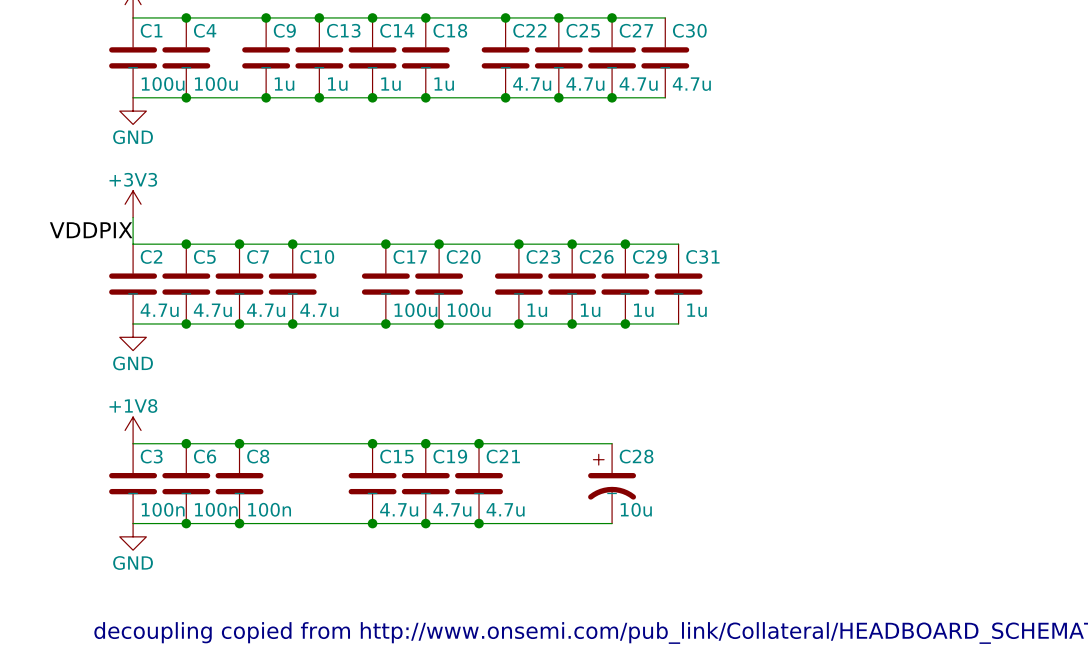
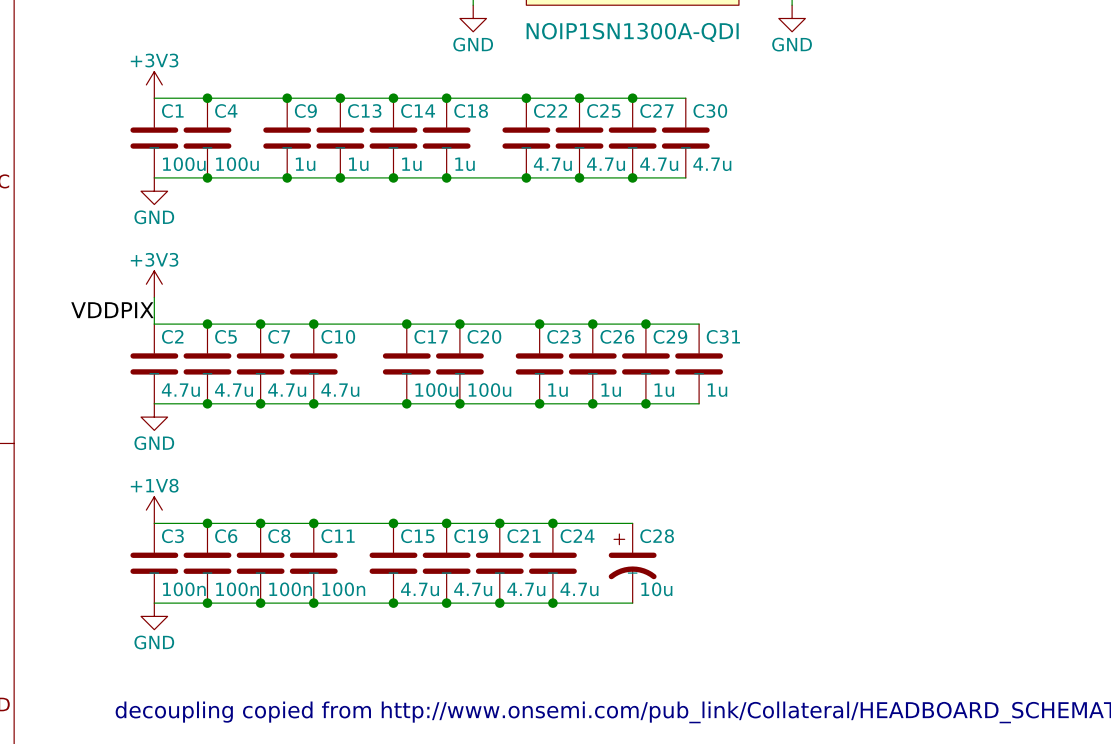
junction: none -> (313, 523)
junction: none -> (552, 523)
C11: none -> 100n (313, 563)
C24: none -> 4.7u (552, 563)
junction: none -> (313, 603)
junction: none -> (552, 603)

